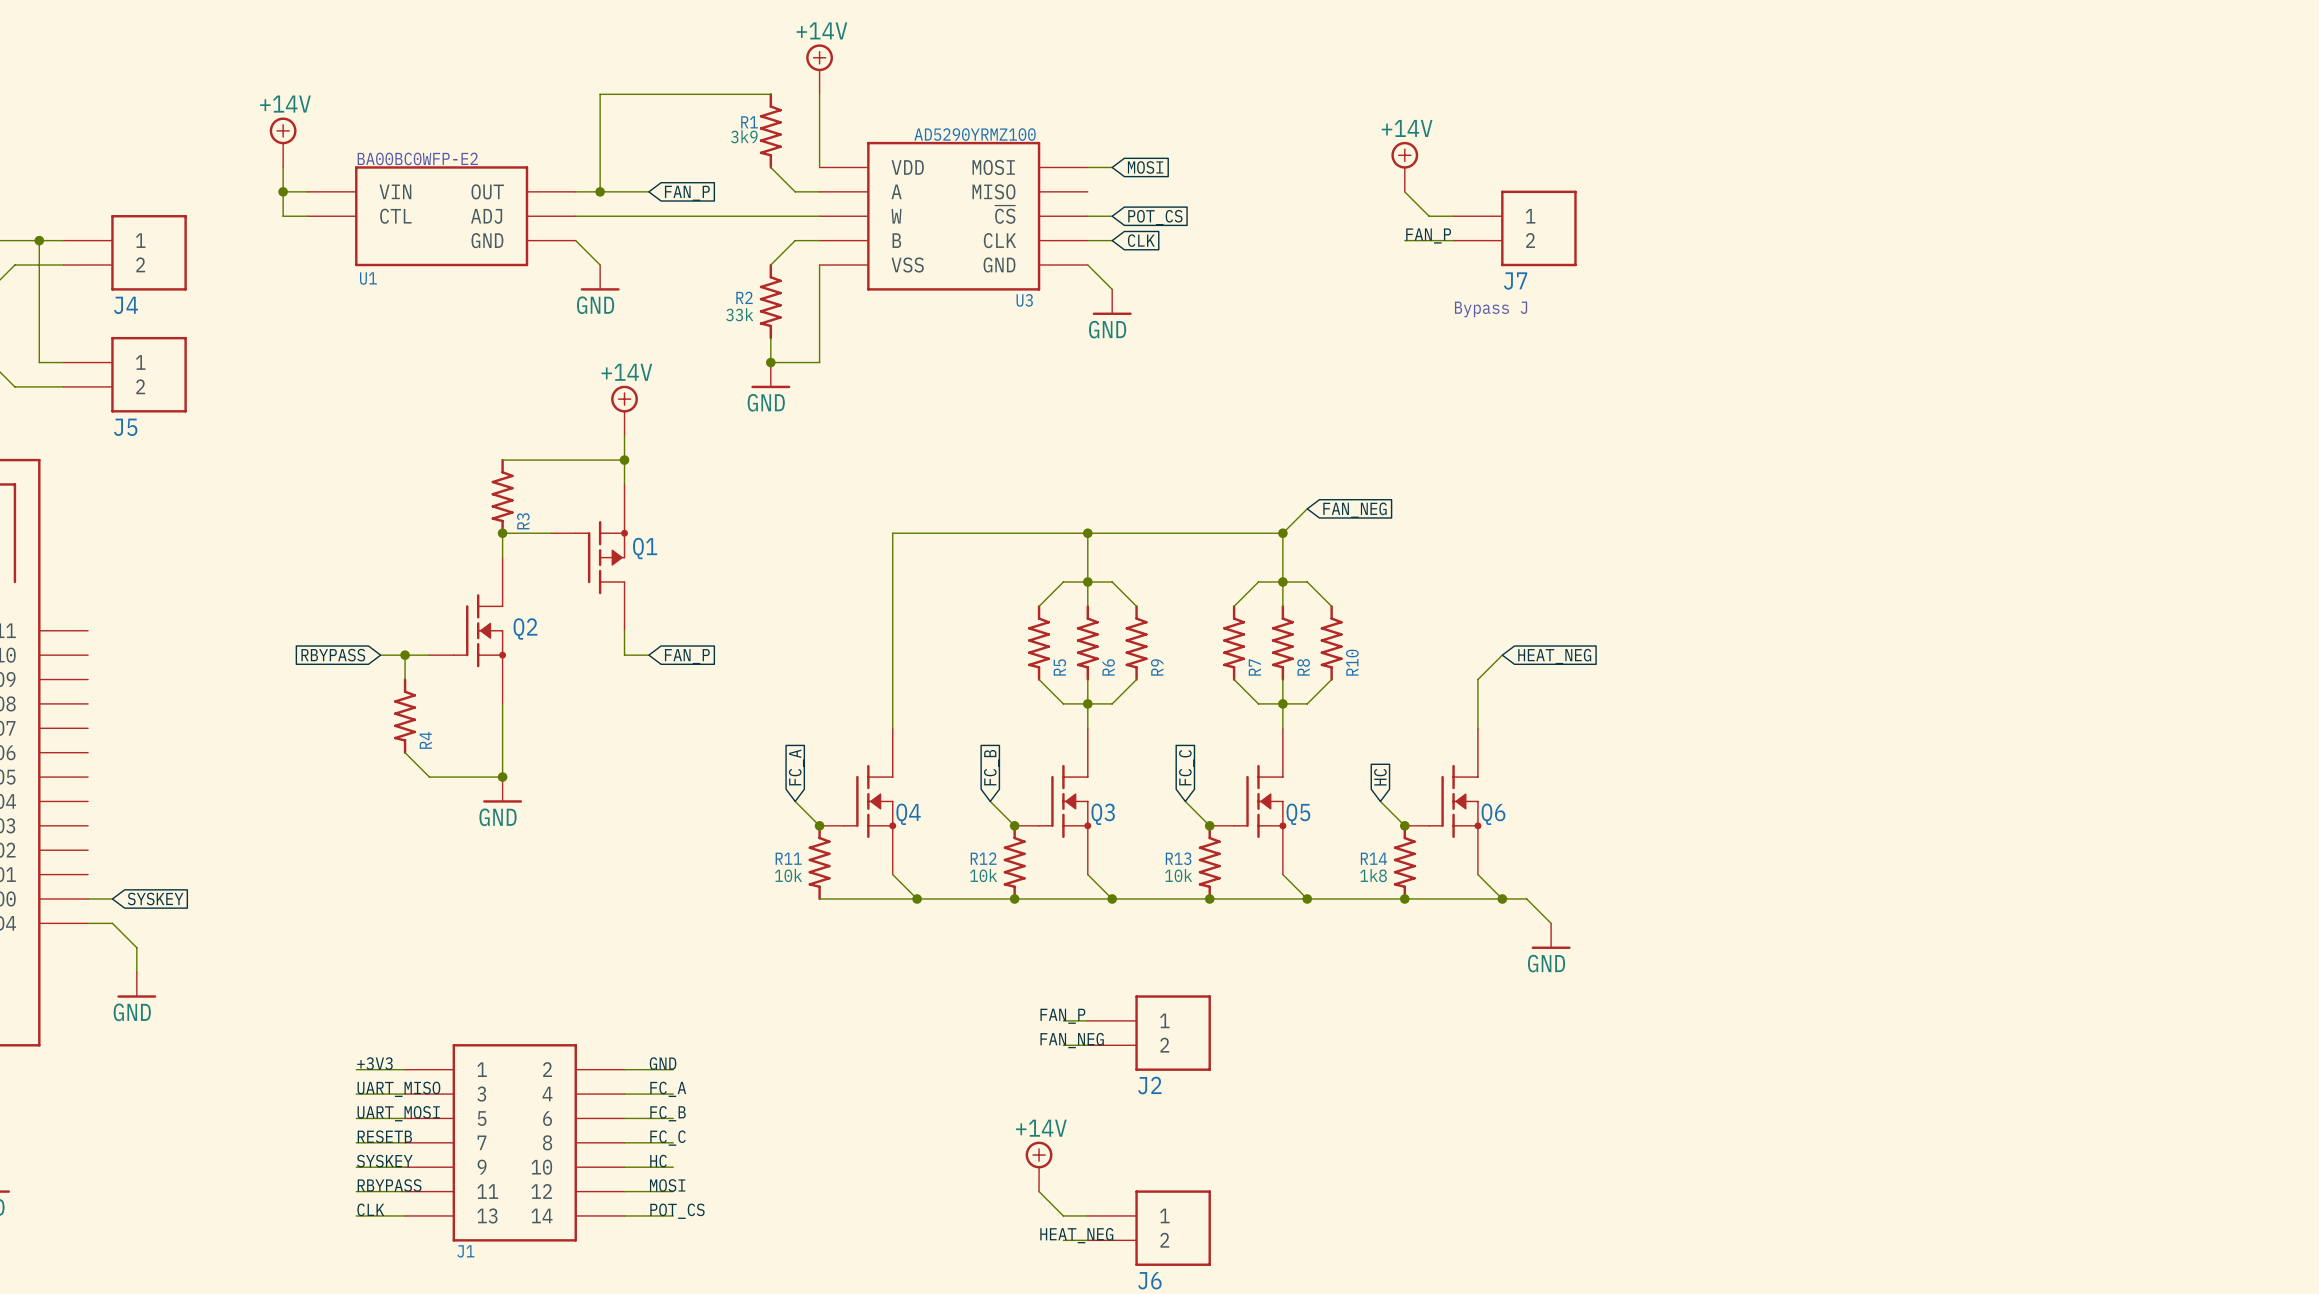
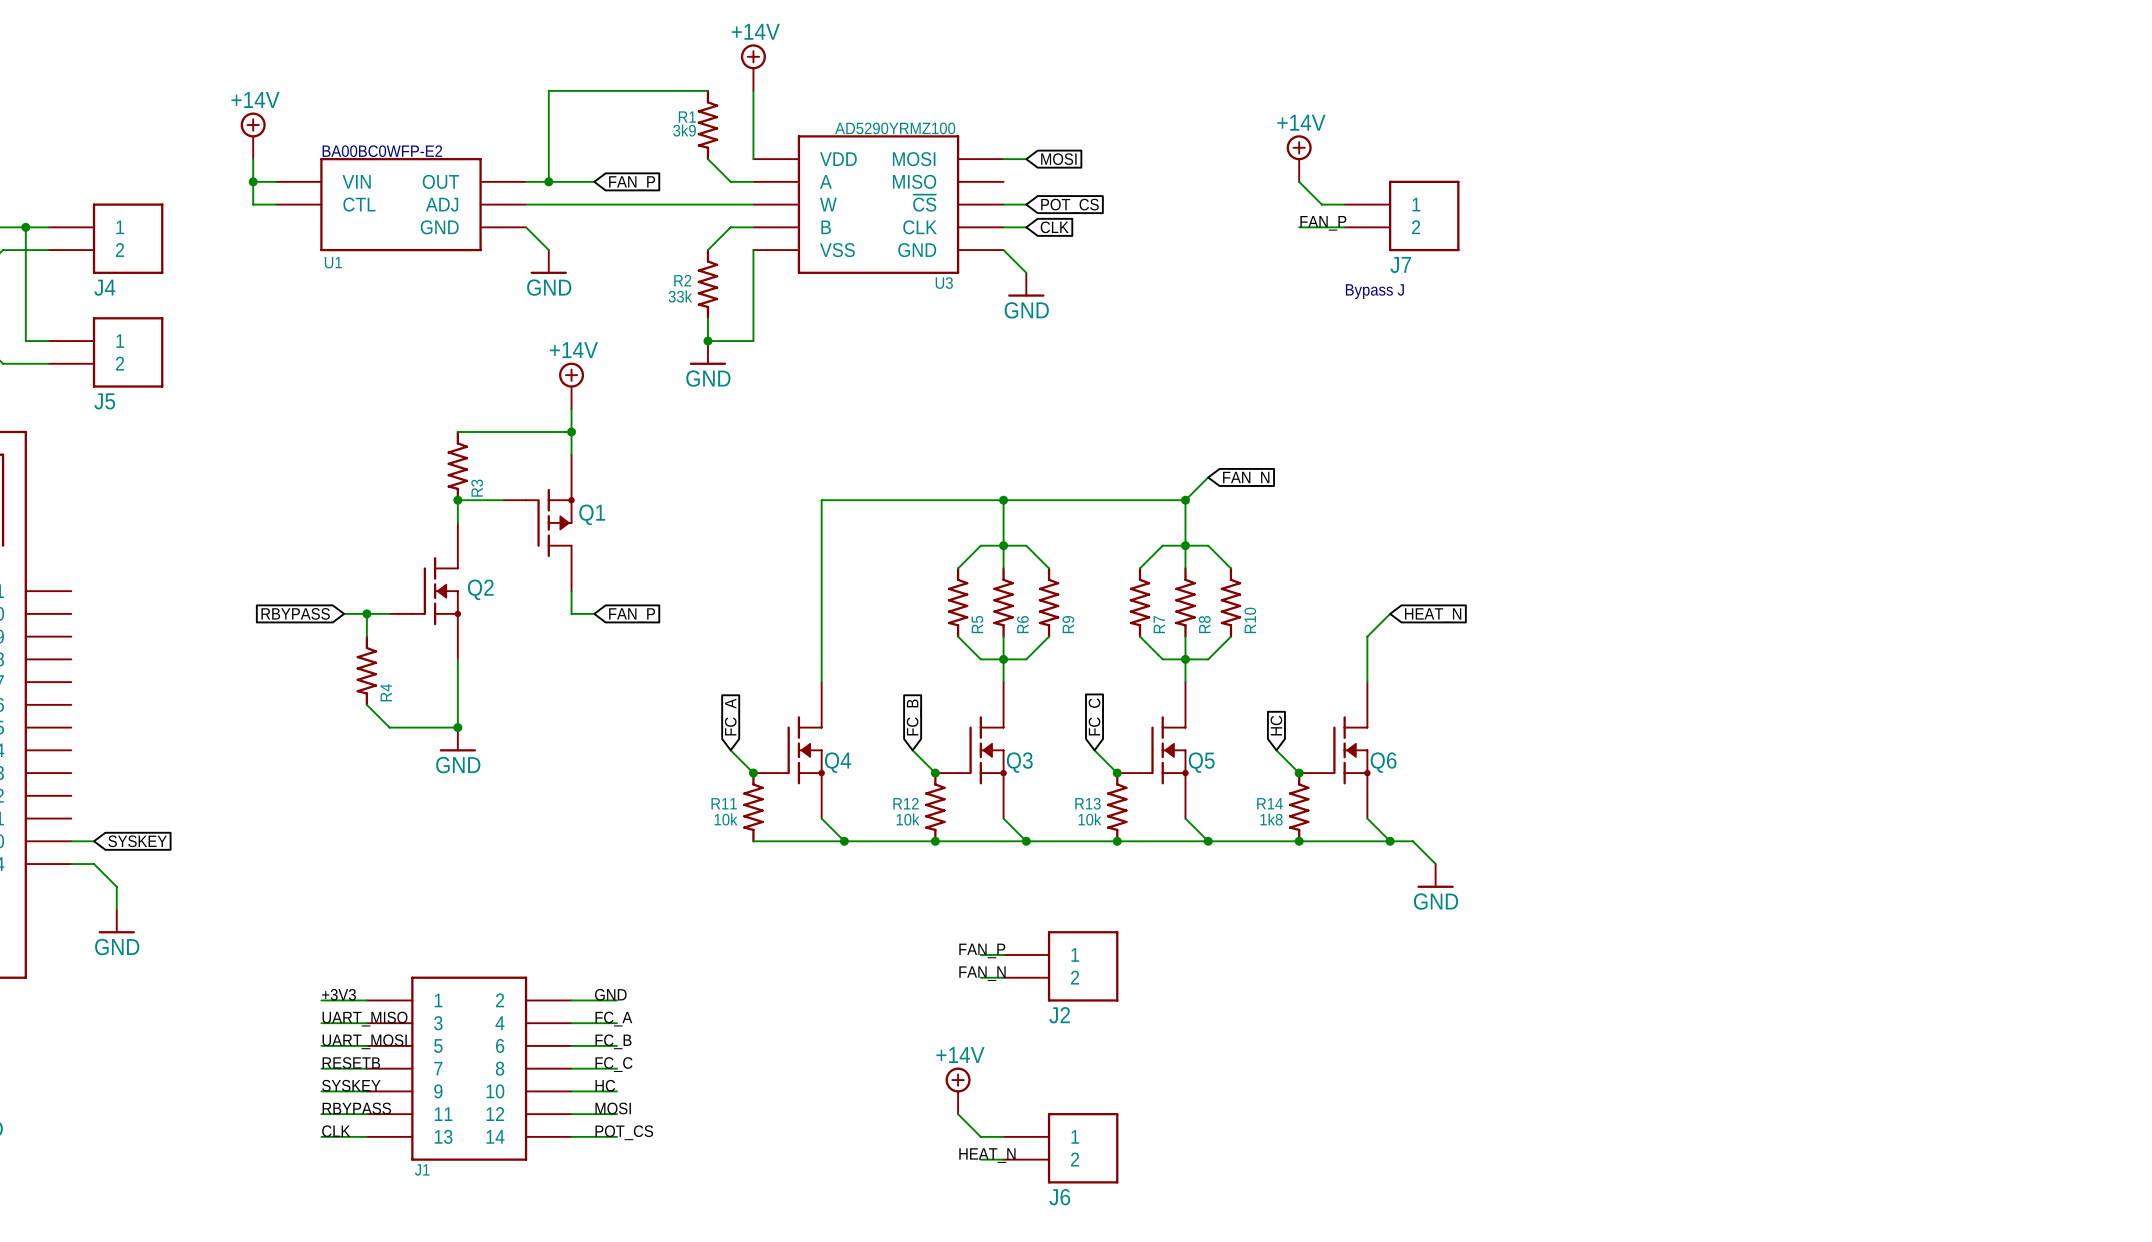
global label: FAN_NEG (1354, 510) -> FAN_N (1246, 479)
global label: HEAT_NEG (1554, 656) -> HEAT_N (1433, 615)
label: FAN_NEG (1072, 1040) -> FAN_N (982, 973)
label: HEAT_NEG (1076, 1235) -> HEAT_N (987, 1155)

